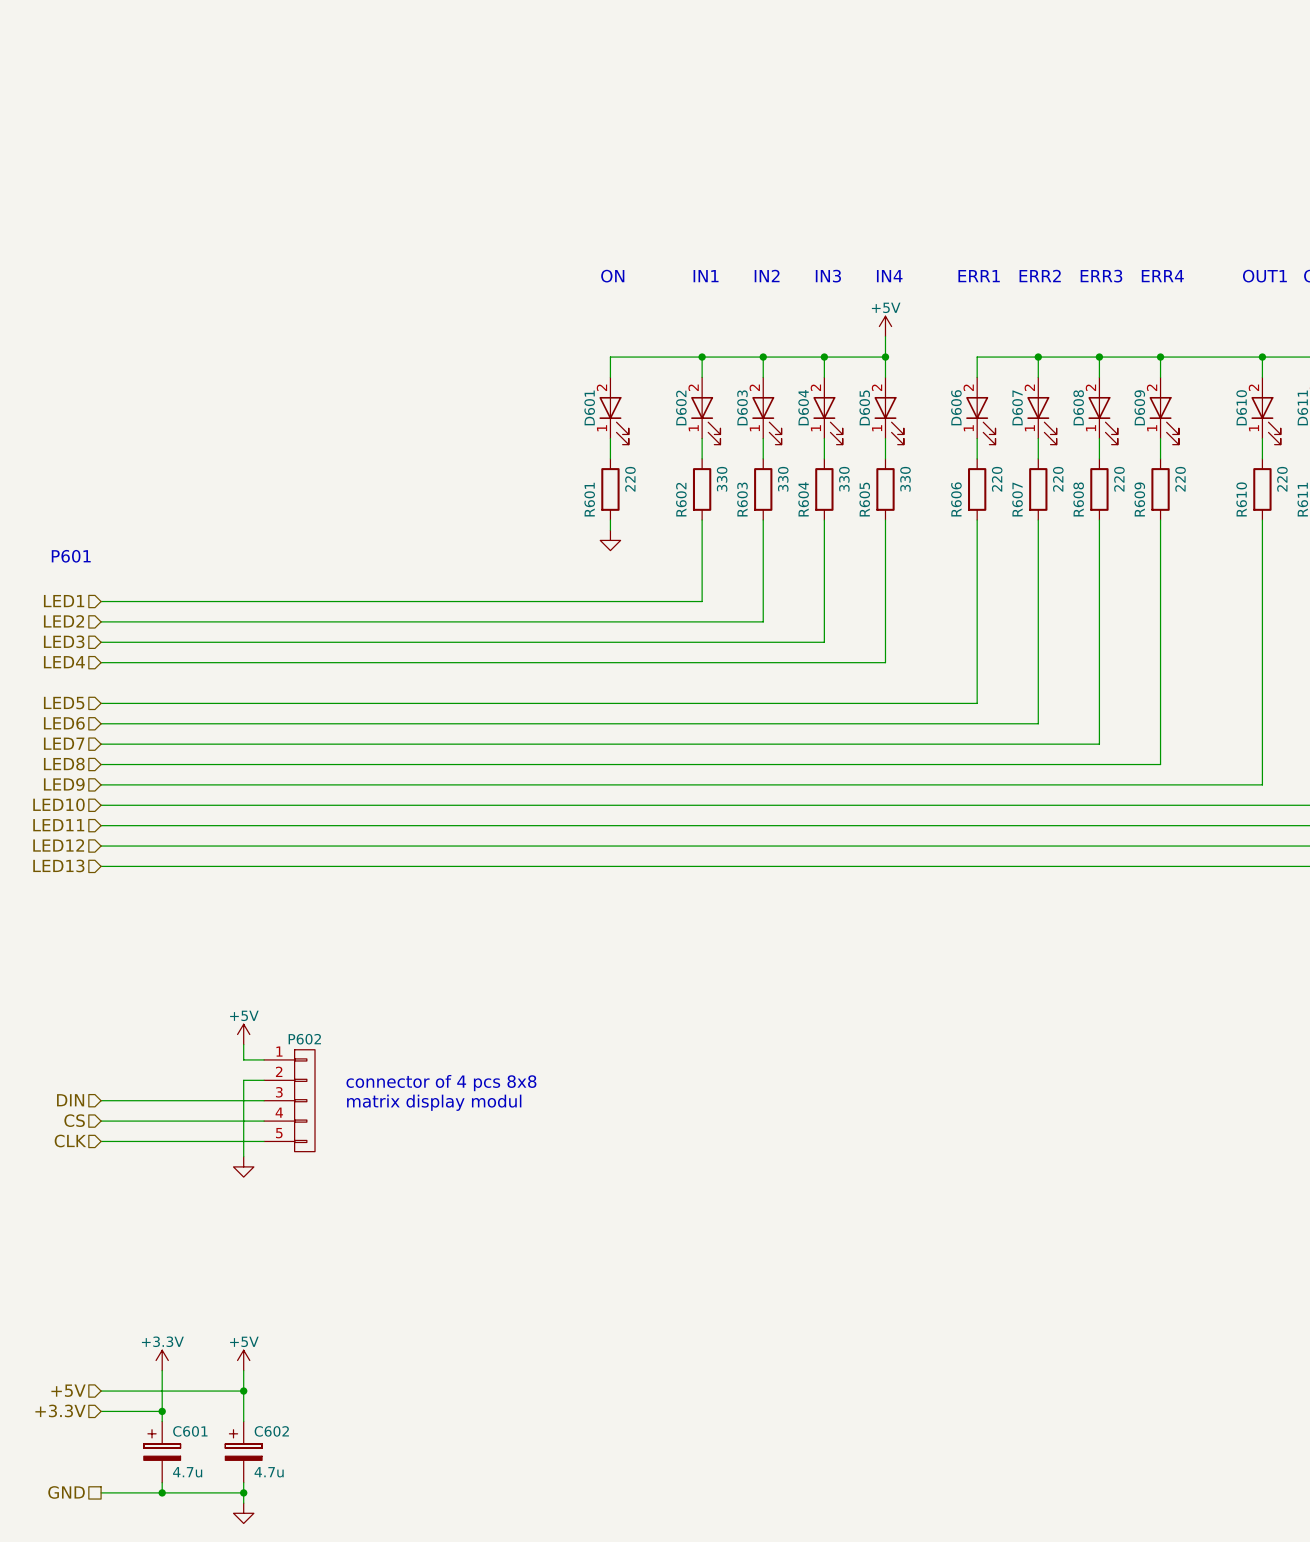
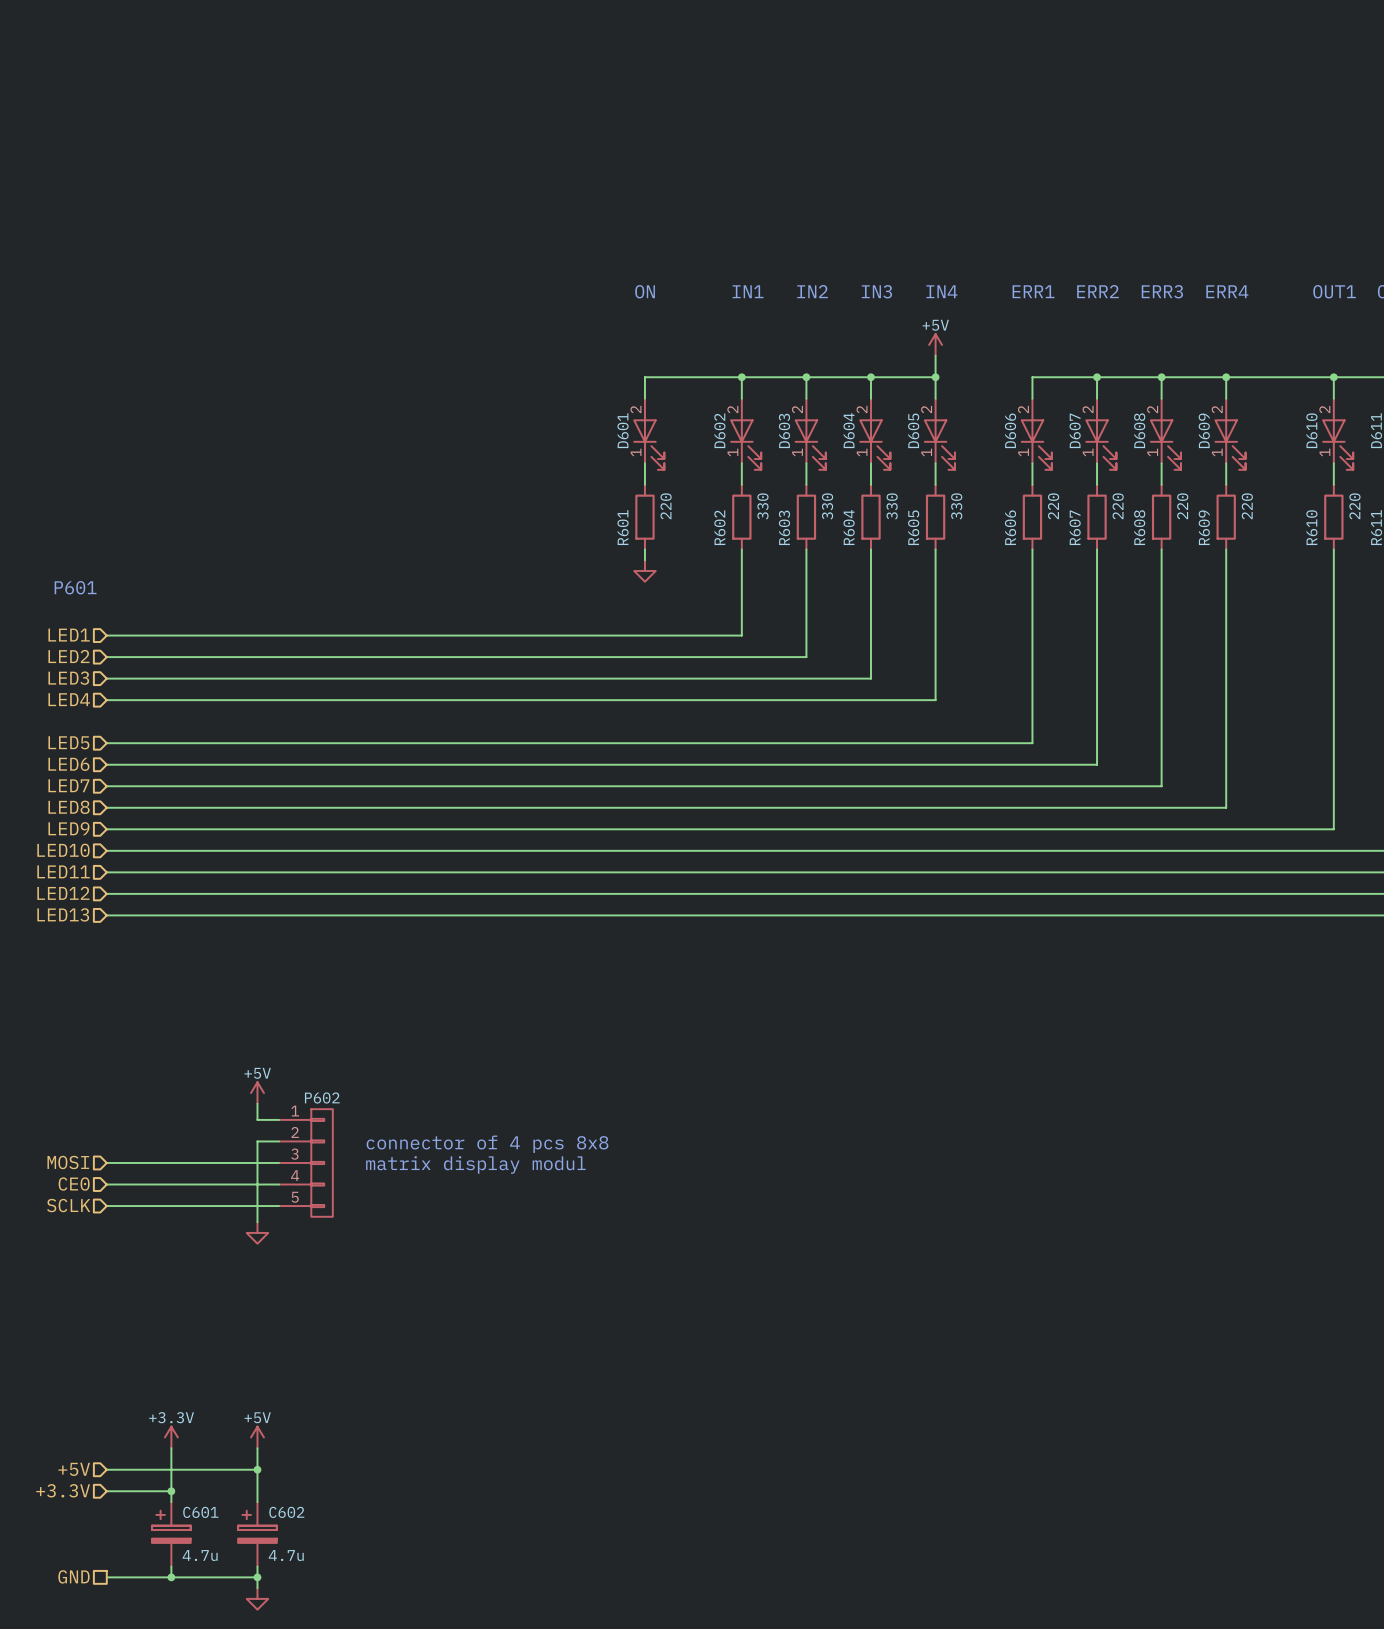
hierarchical label: DIN (70, 1100) -> MOSI (68, 1162)
hierarchical label: CS (74, 1120) -> CE0 (74, 1184)
hierarchical label: CLK (70, 1141) -> SCLK (68, 1205)

